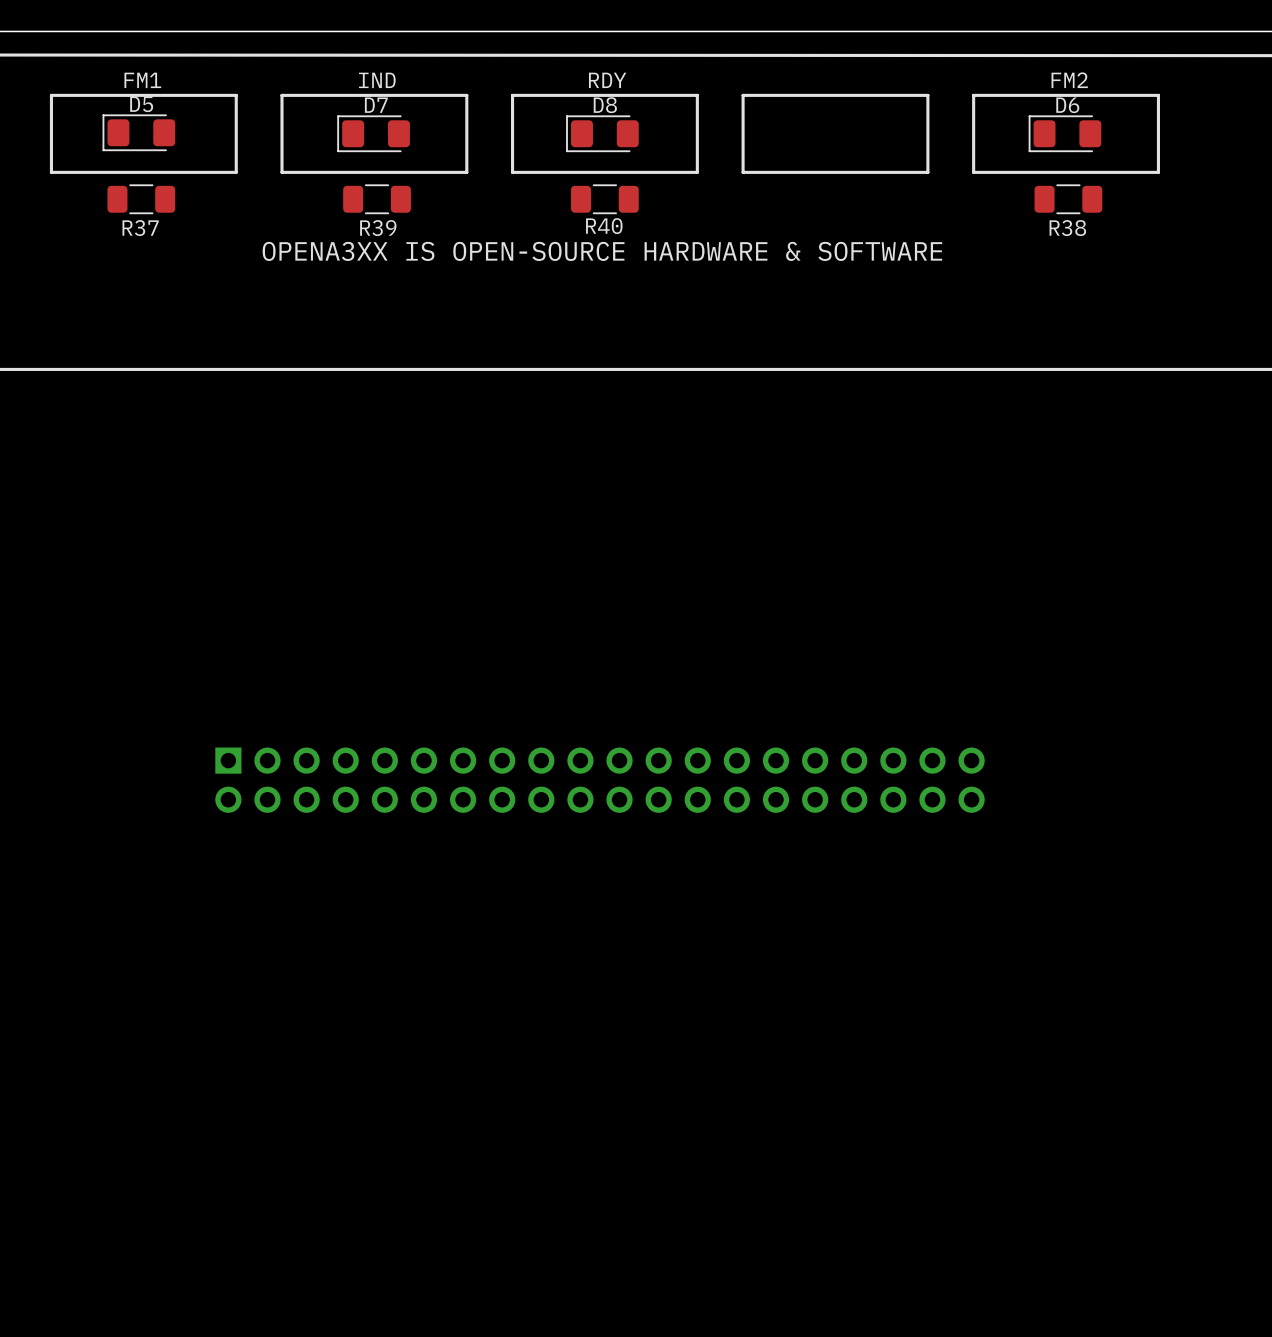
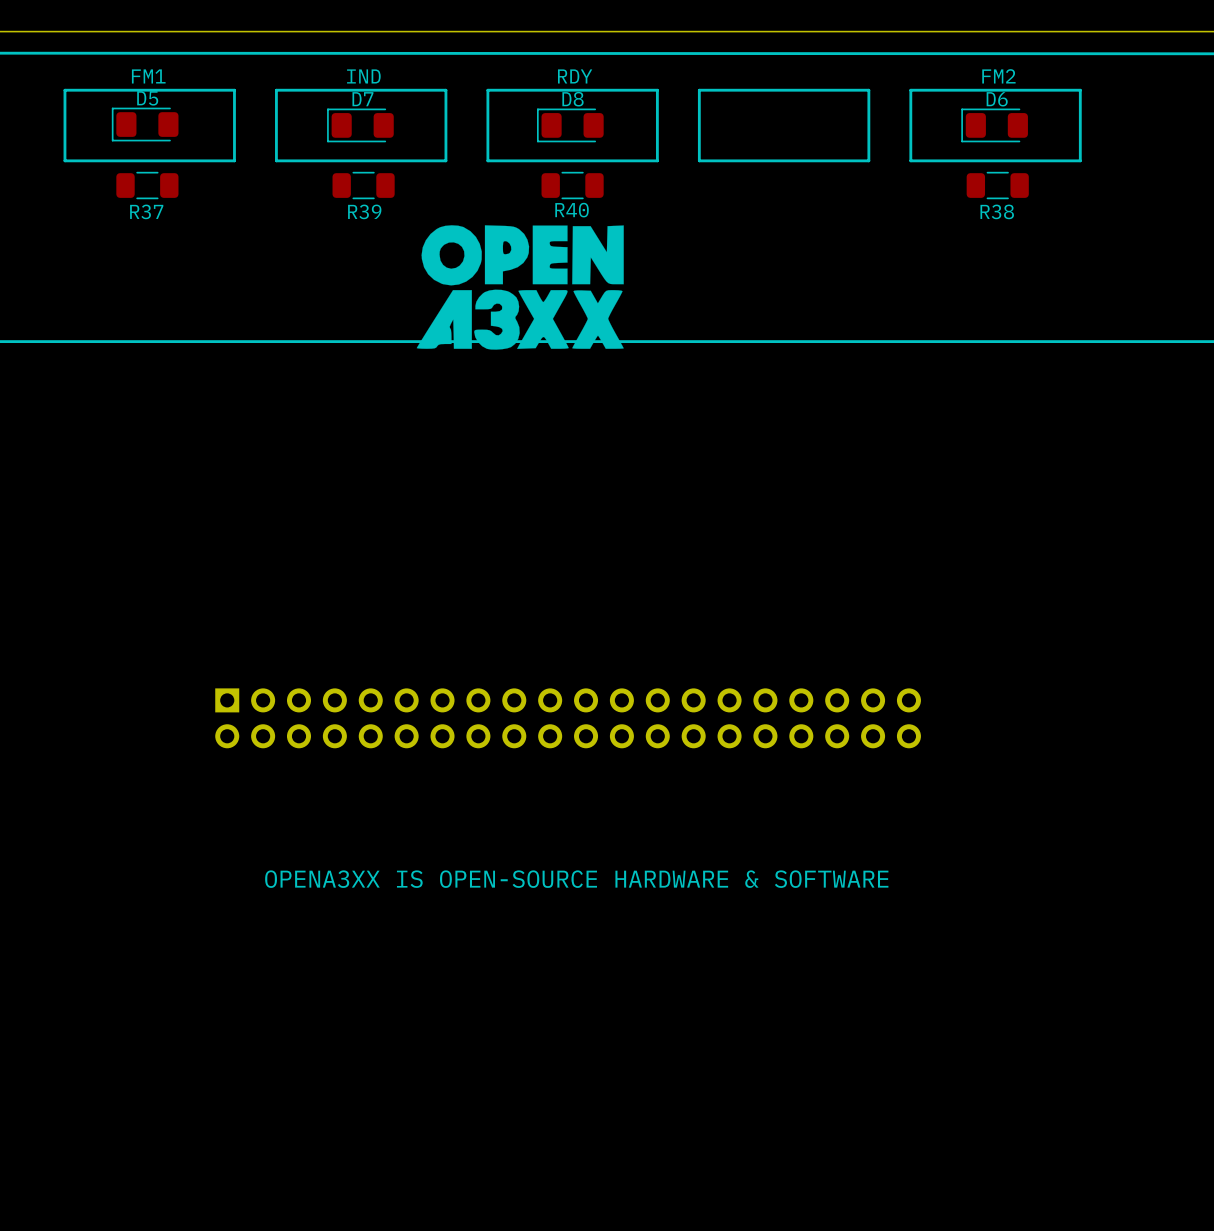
drawing: none -> [416, 225, 624, 350]
text: OPENA3XX IS OPEN-SOURCE HARDWARE & SOFTWARE (602, 251) -> none
text: none -> OPENA3XX IS OPEN-SOURCE HARDWARE & SOFTWARE (576, 879)

